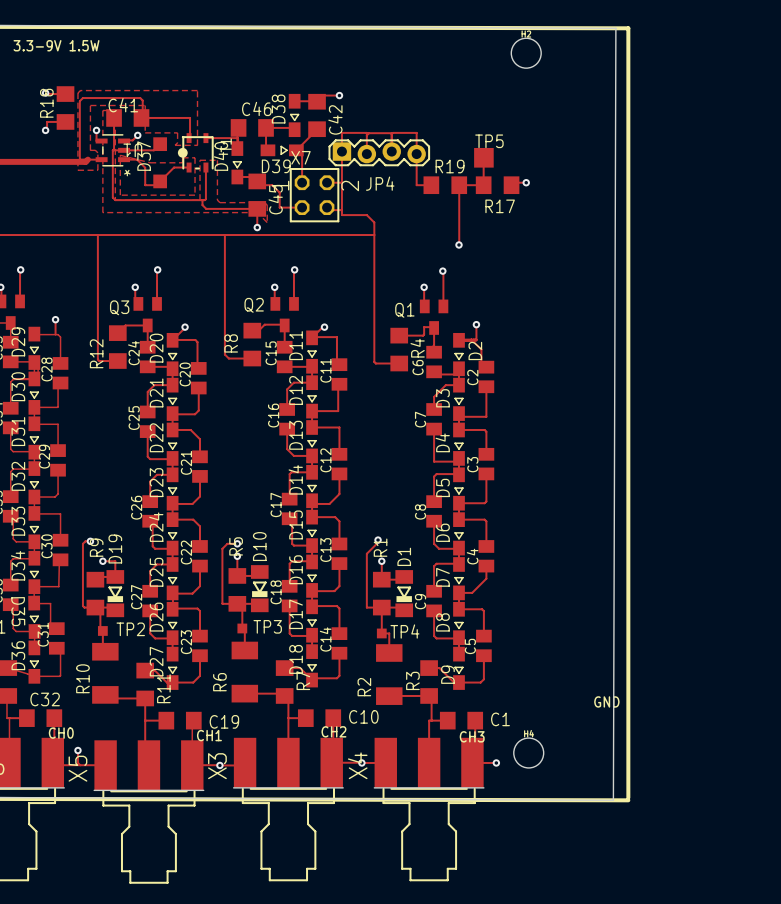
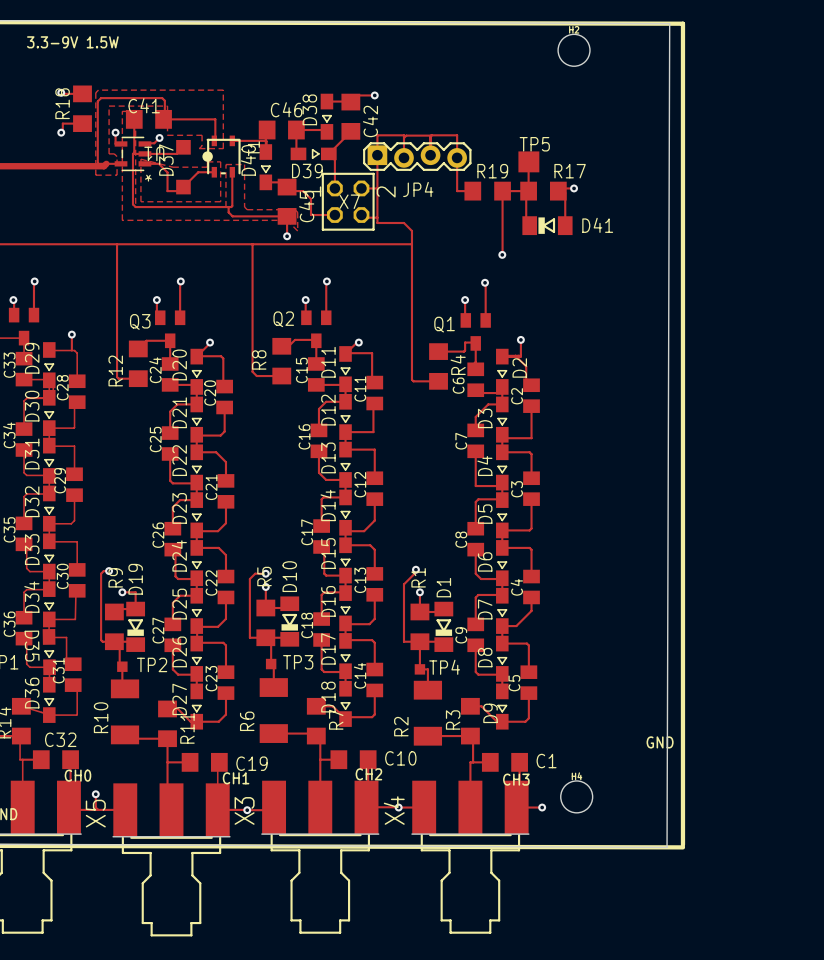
X7 name position: X7 (300, 157) -> X7 (349, 201)
track: none -> (560, 188) (565, 192) (565, 225)
track: none -> (526, 191) (526, 222) (529, 225)
R17 name position: R17 (500, 206) -> R17 (570, 171)
D41: none -> (547, 225)

